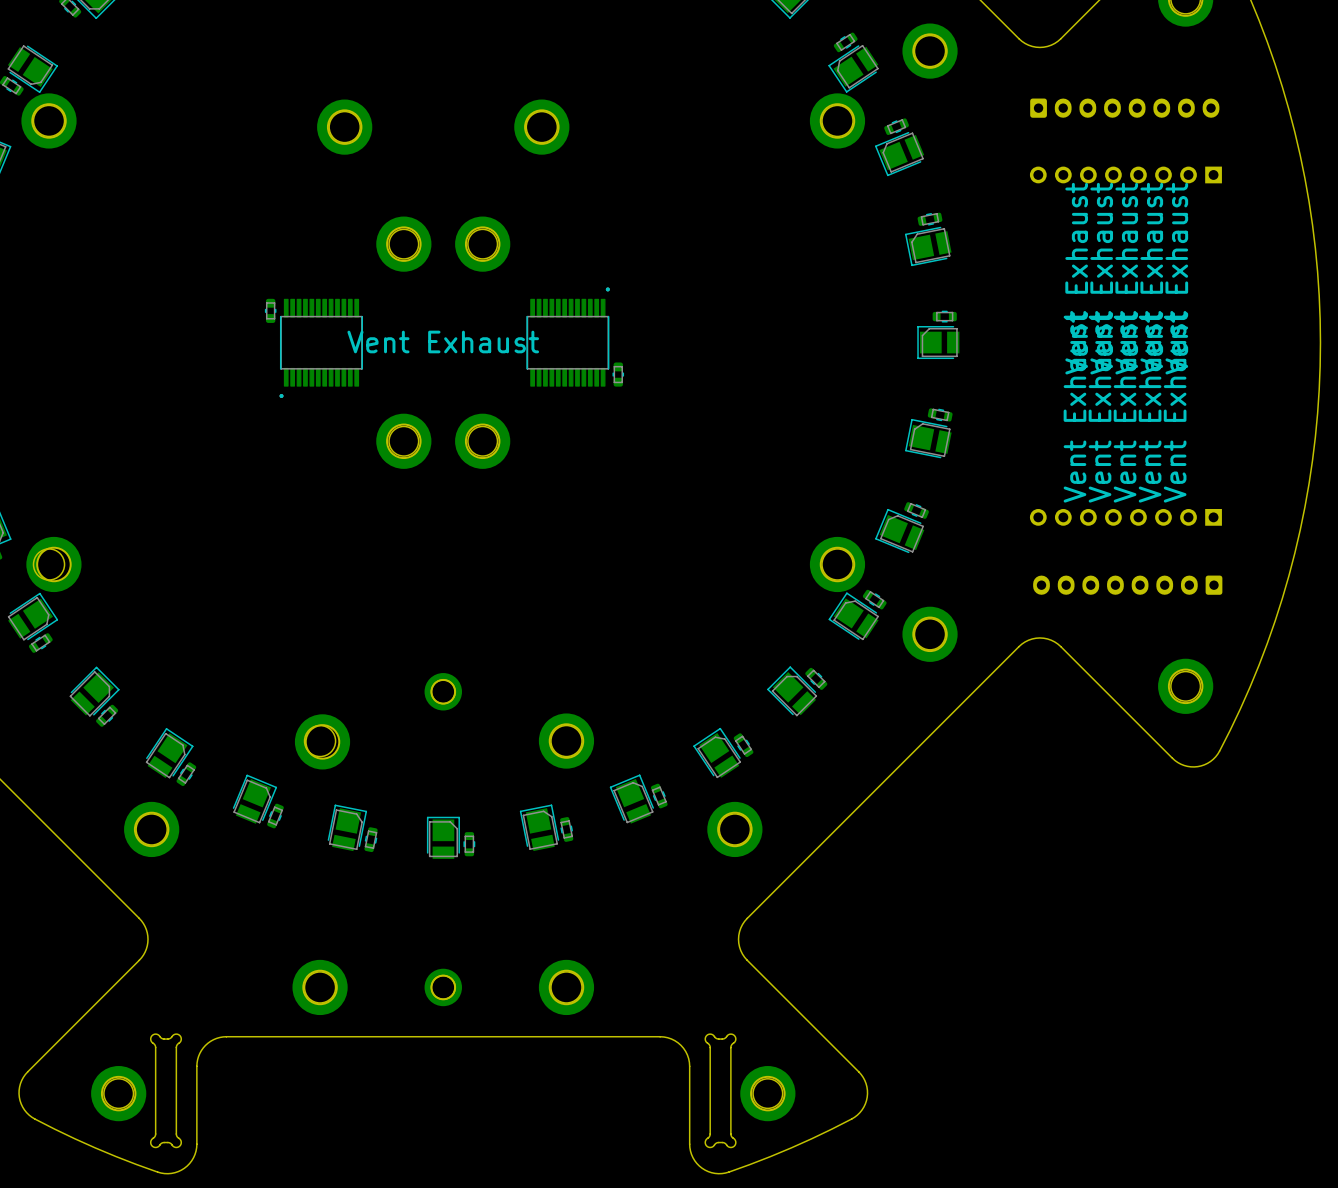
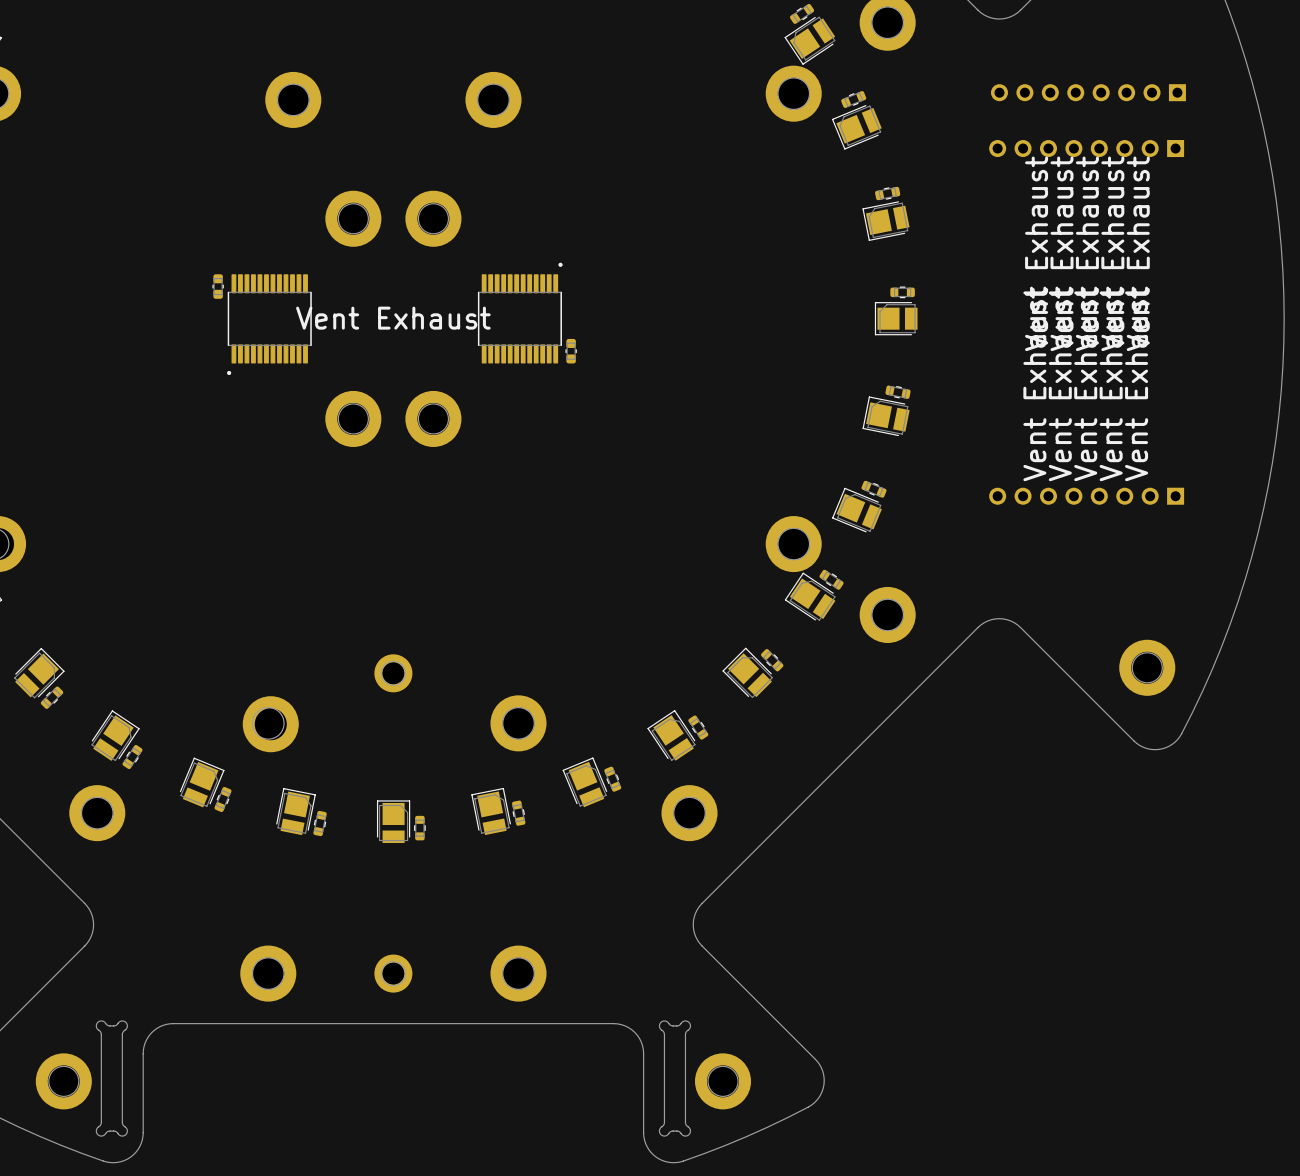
part: (1124, 108) -> none
part: none -> (1088, 92)
part: (1127, 585) -> none

